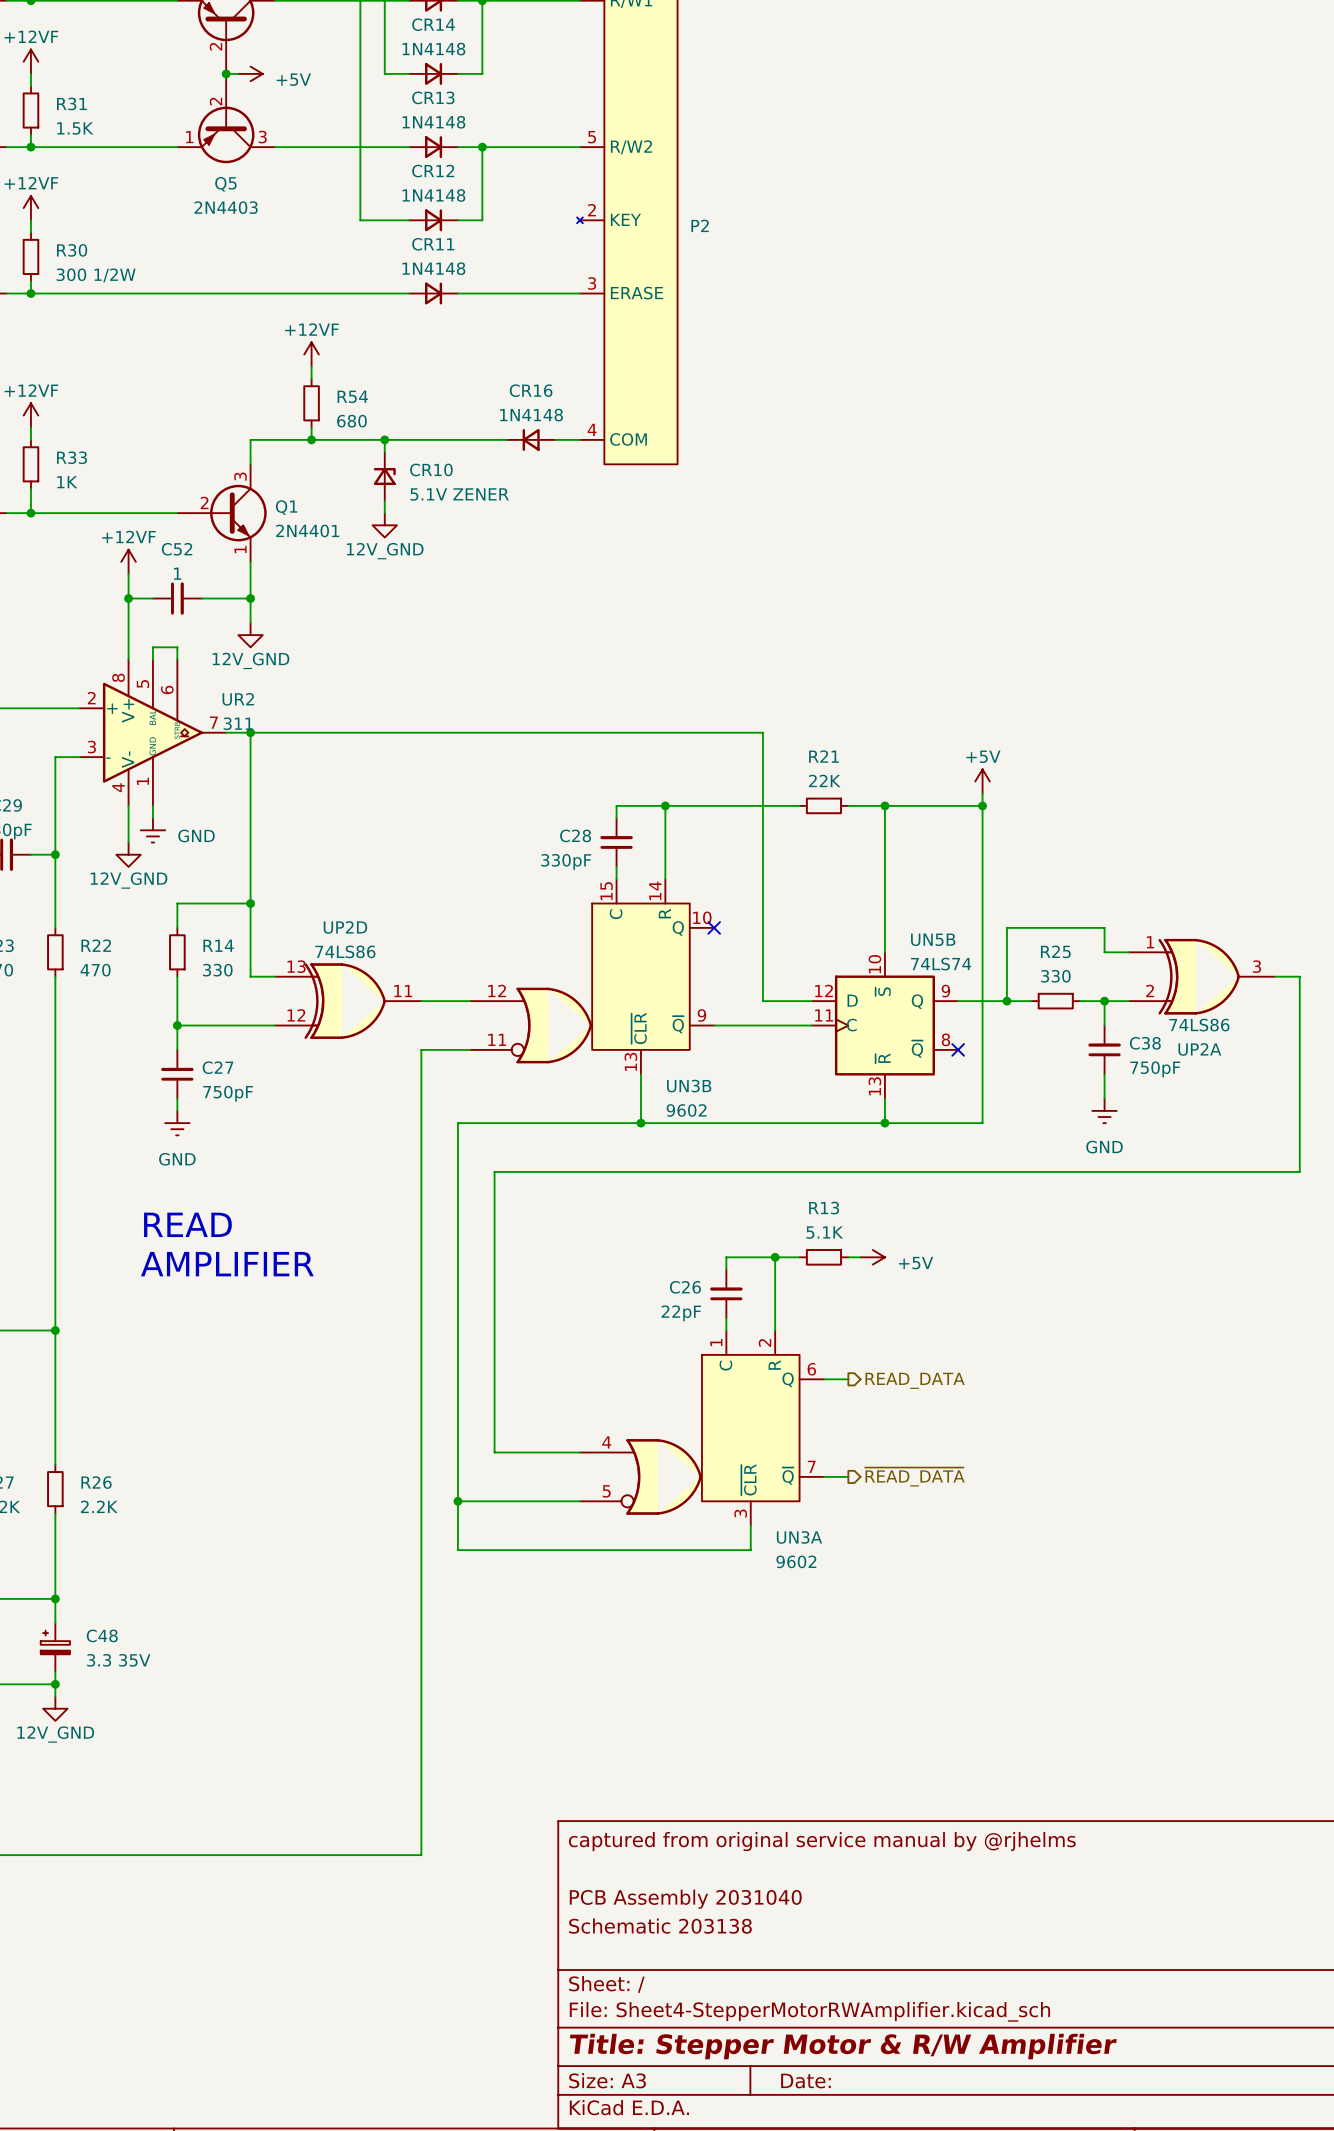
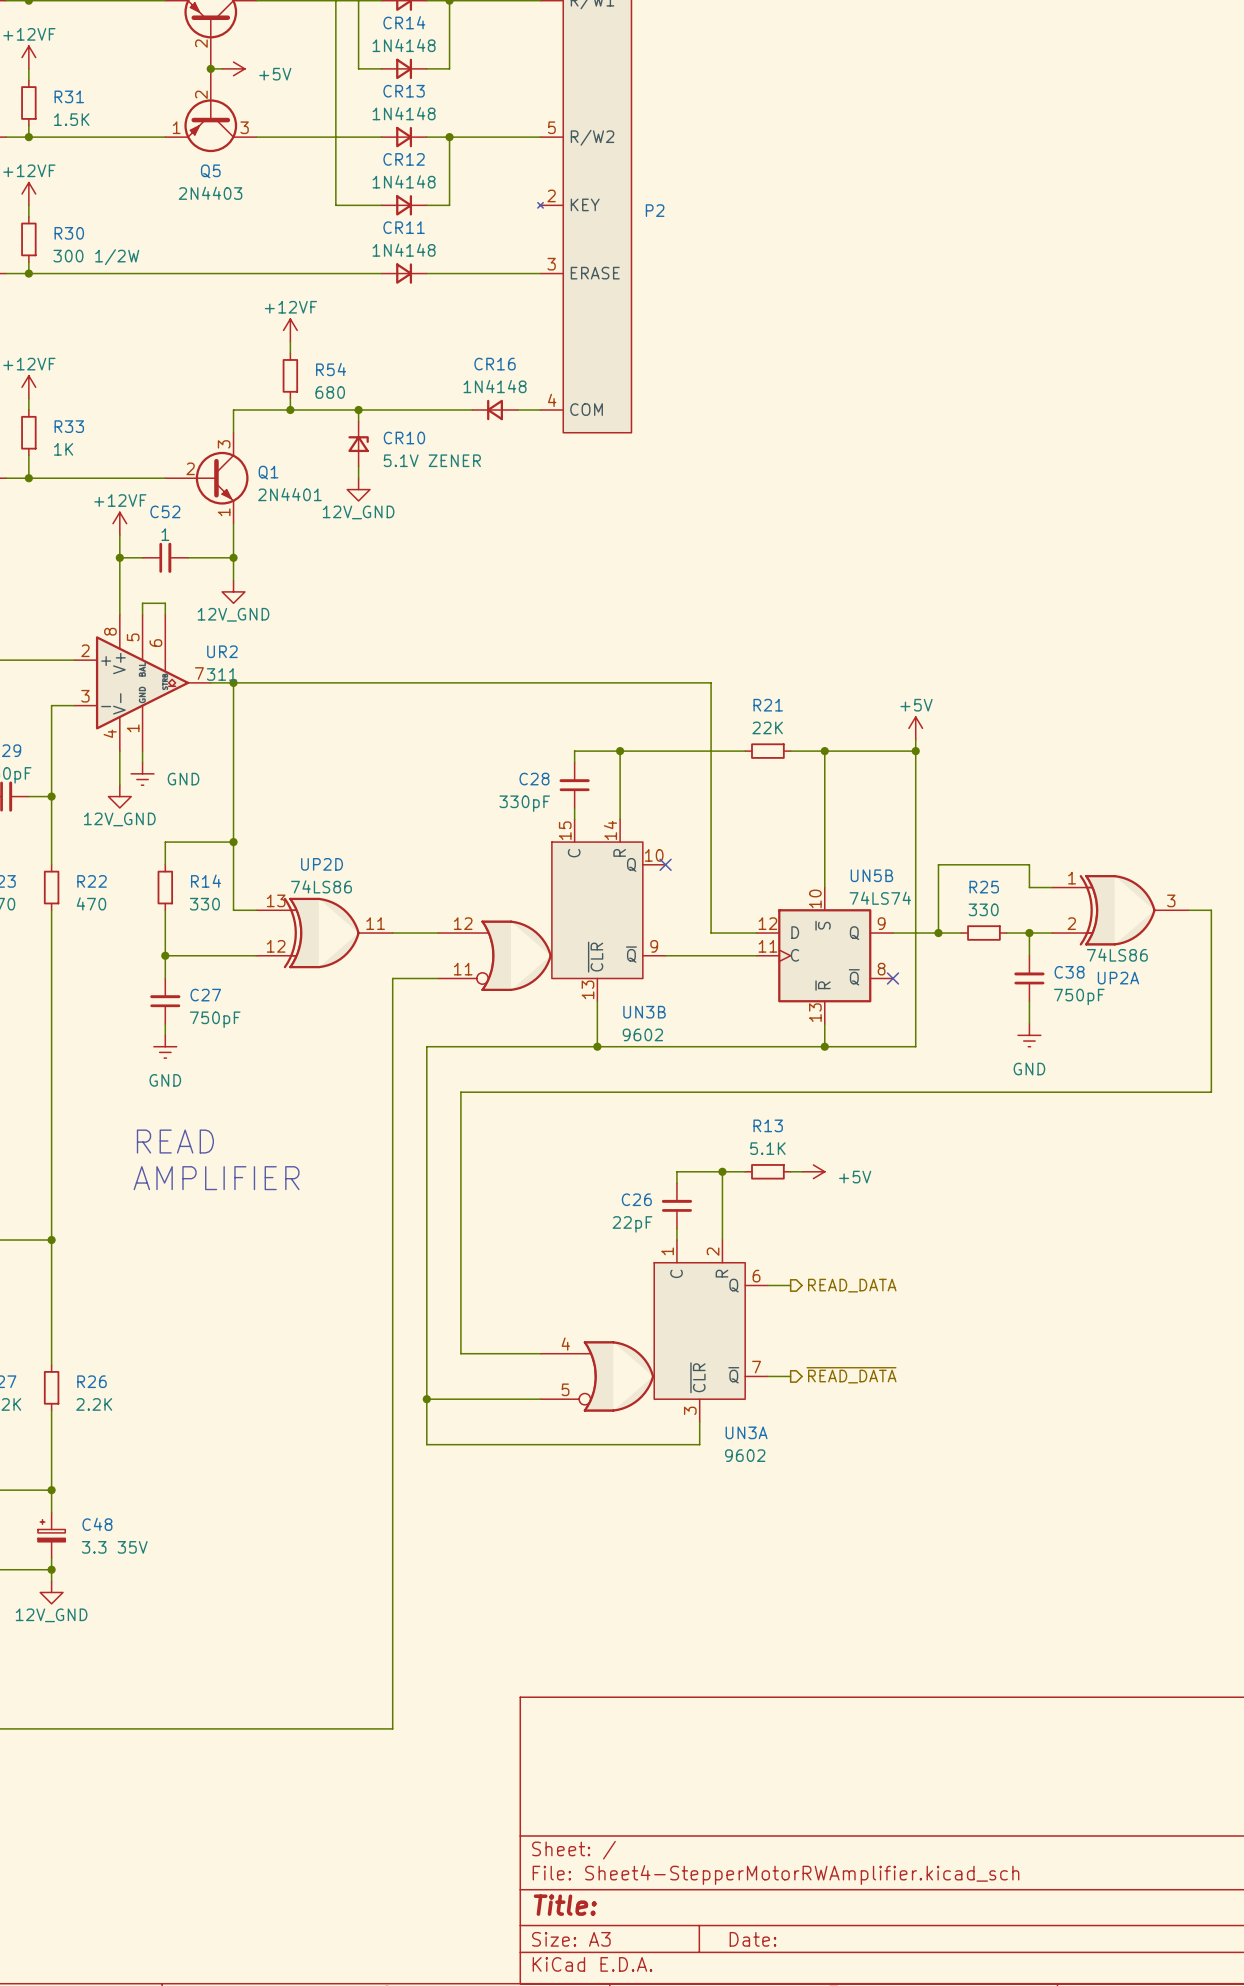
title block: captured from original service manual by @rjhelms (822, 1841) -> none
title block: PCB Assembly 2031040 (685, 1899) -> none
title block: Schematic 203138 (660, 1926) -> none
title block: Title: Stepper Motor & R/W Amplifier (843, 2046) -> Title: (565, 1905)

